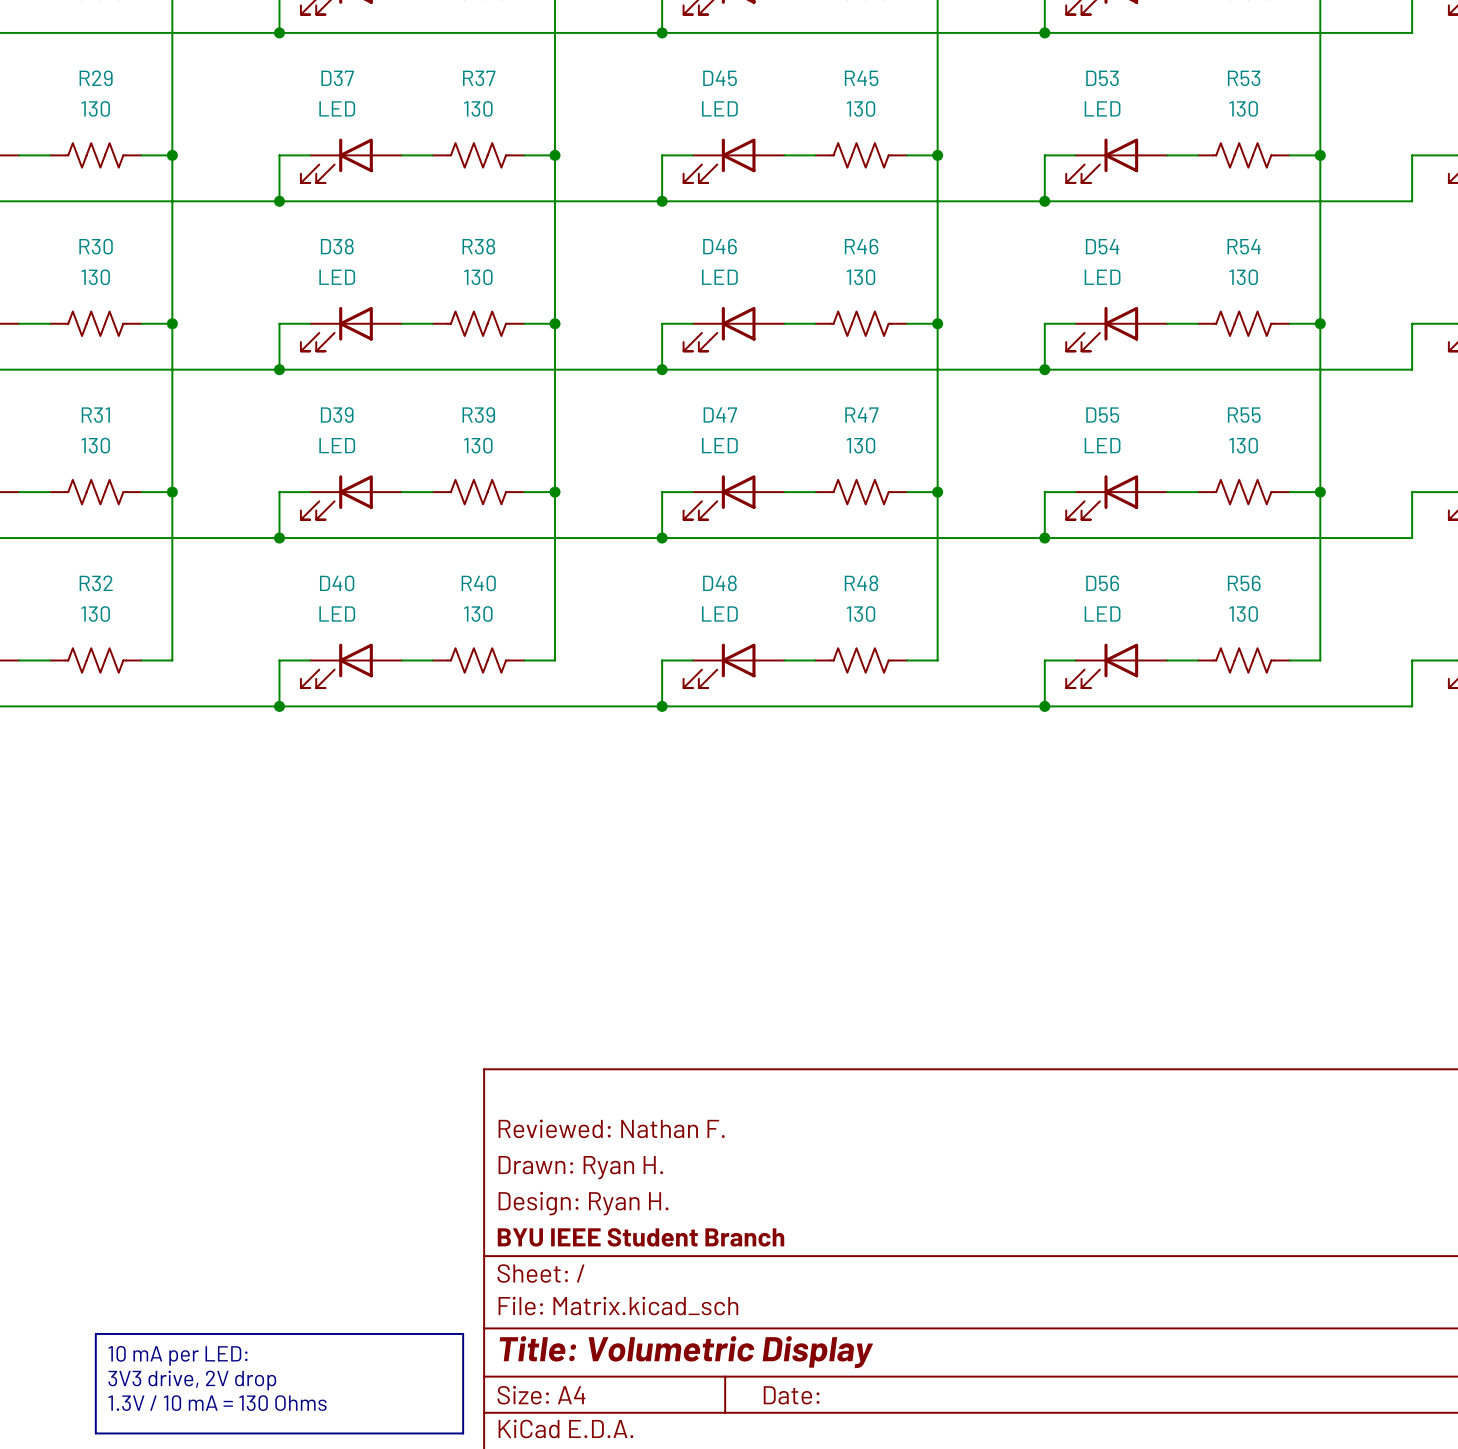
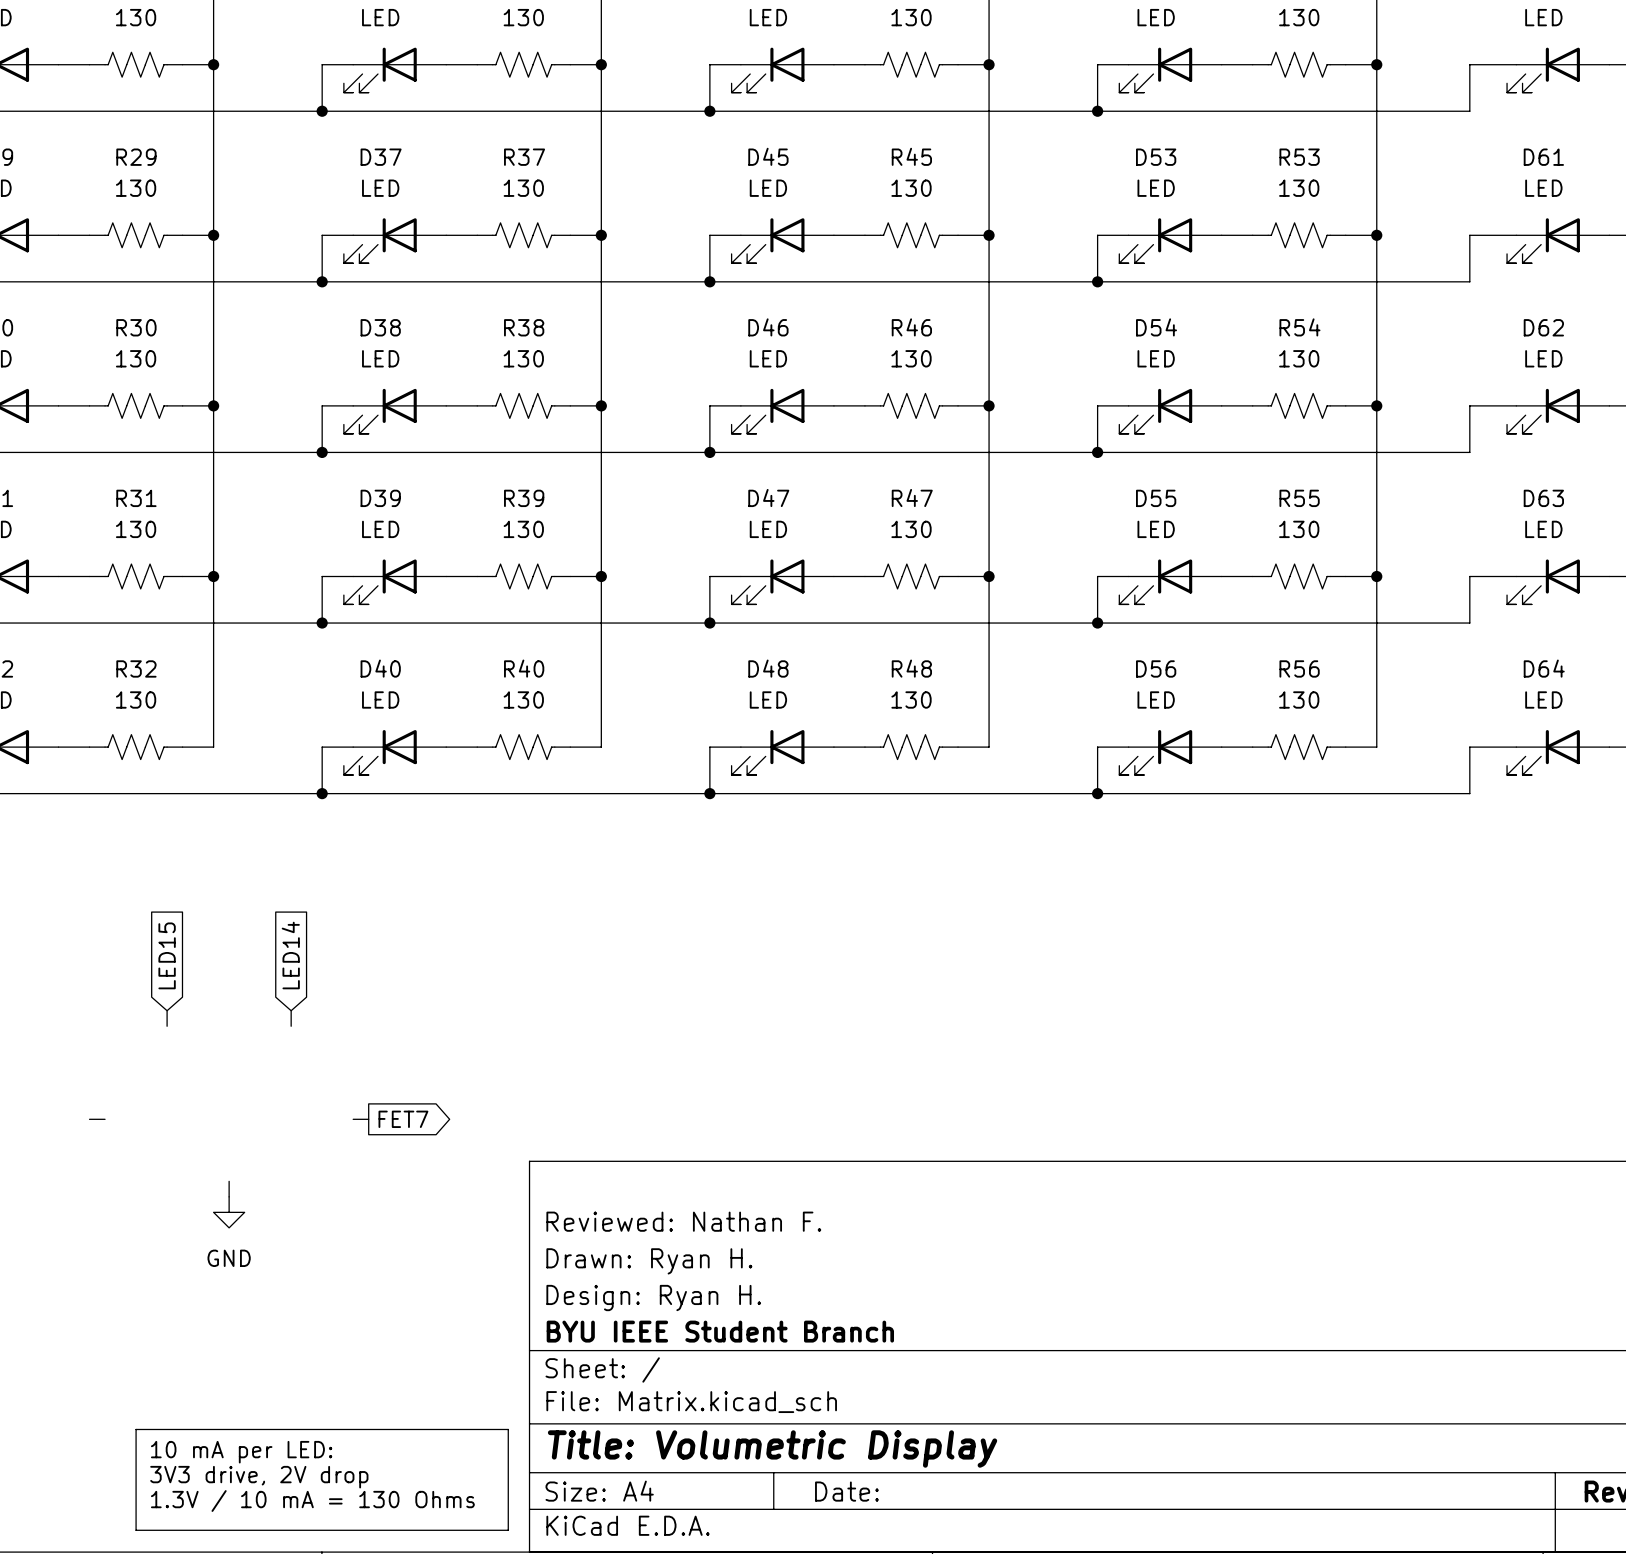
global label: none -> LED15 (167, 955)
global label: none -> LED14 (290, 955)
wire: none -> (167, 1010) (167, 1026)
wire: none -> (291, 1010) (291, 1026)
wire: none -> (89, 1119) (105, 1119)
wire: none -> (353, 1119) (368, 1119)
global label: none -> FET7 (403, 1119)
wire: none -> (229, 1181) (229, 1196)
power symbol: none -> GND (229, 1212)

